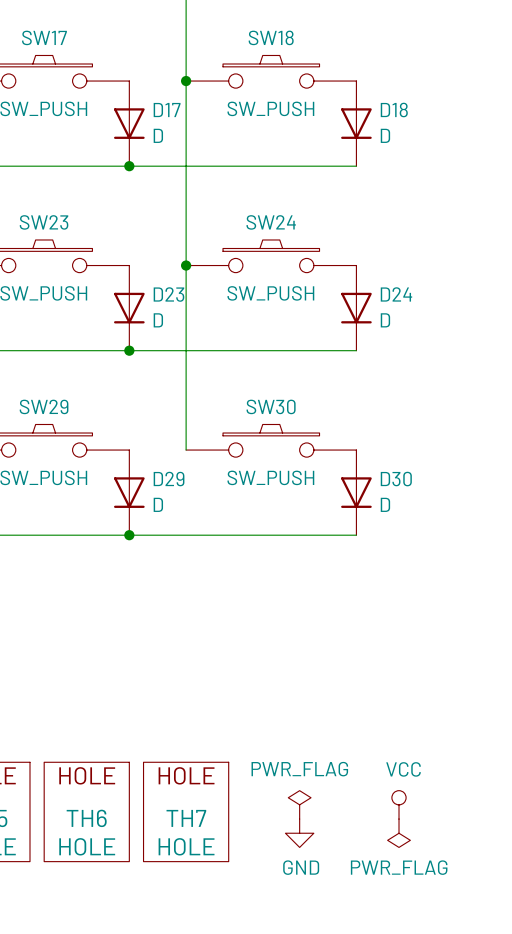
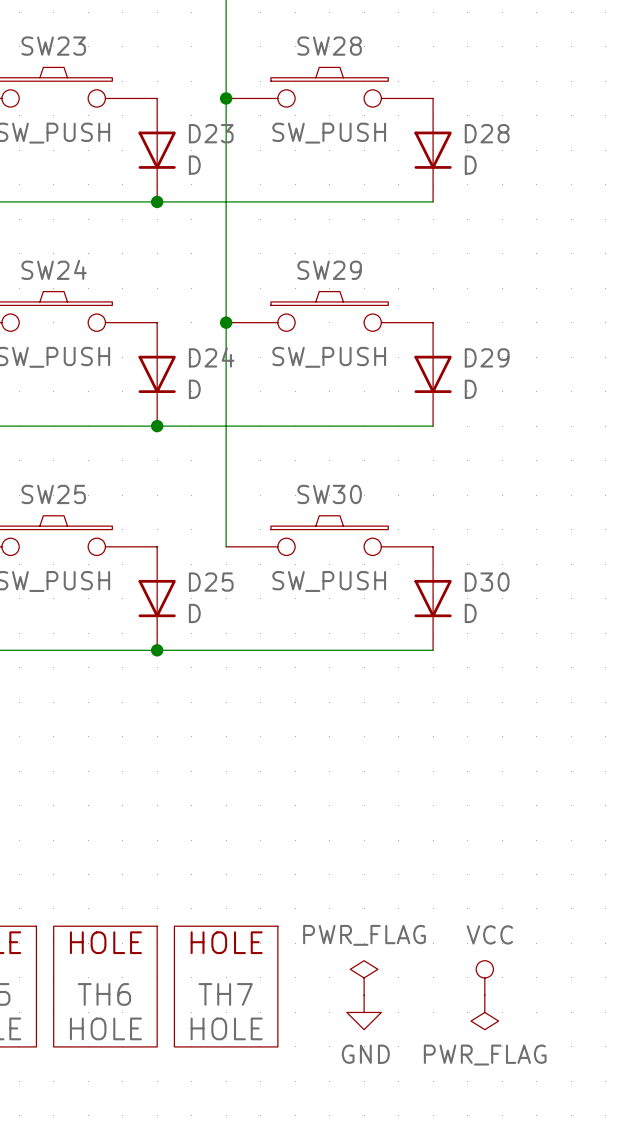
SW17 name: SW17 (44, 37) -> SW23 (53, 46)
SW18 name: SW18 (271, 37) -> SW28 (329, 46)
D17 name: D17 (167, 110) -> D23 (211, 133)
D18 name: D18 (394, 110) -> D28 (487, 133)
SW23 name: SW23 (44, 222) -> SW24 (54, 269)
SW24 name: SW24 (271, 222) -> SW29 (329, 270)
D23 name: D23 (168, 294) -> D24 (211, 357)
D24 name: D24 (396, 294) -> D29 (487, 357)
SW29 name: SW29 (44, 406) -> SW25 (53, 494)
D29 name: D29 (169, 479) -> D25 (211, 582)

